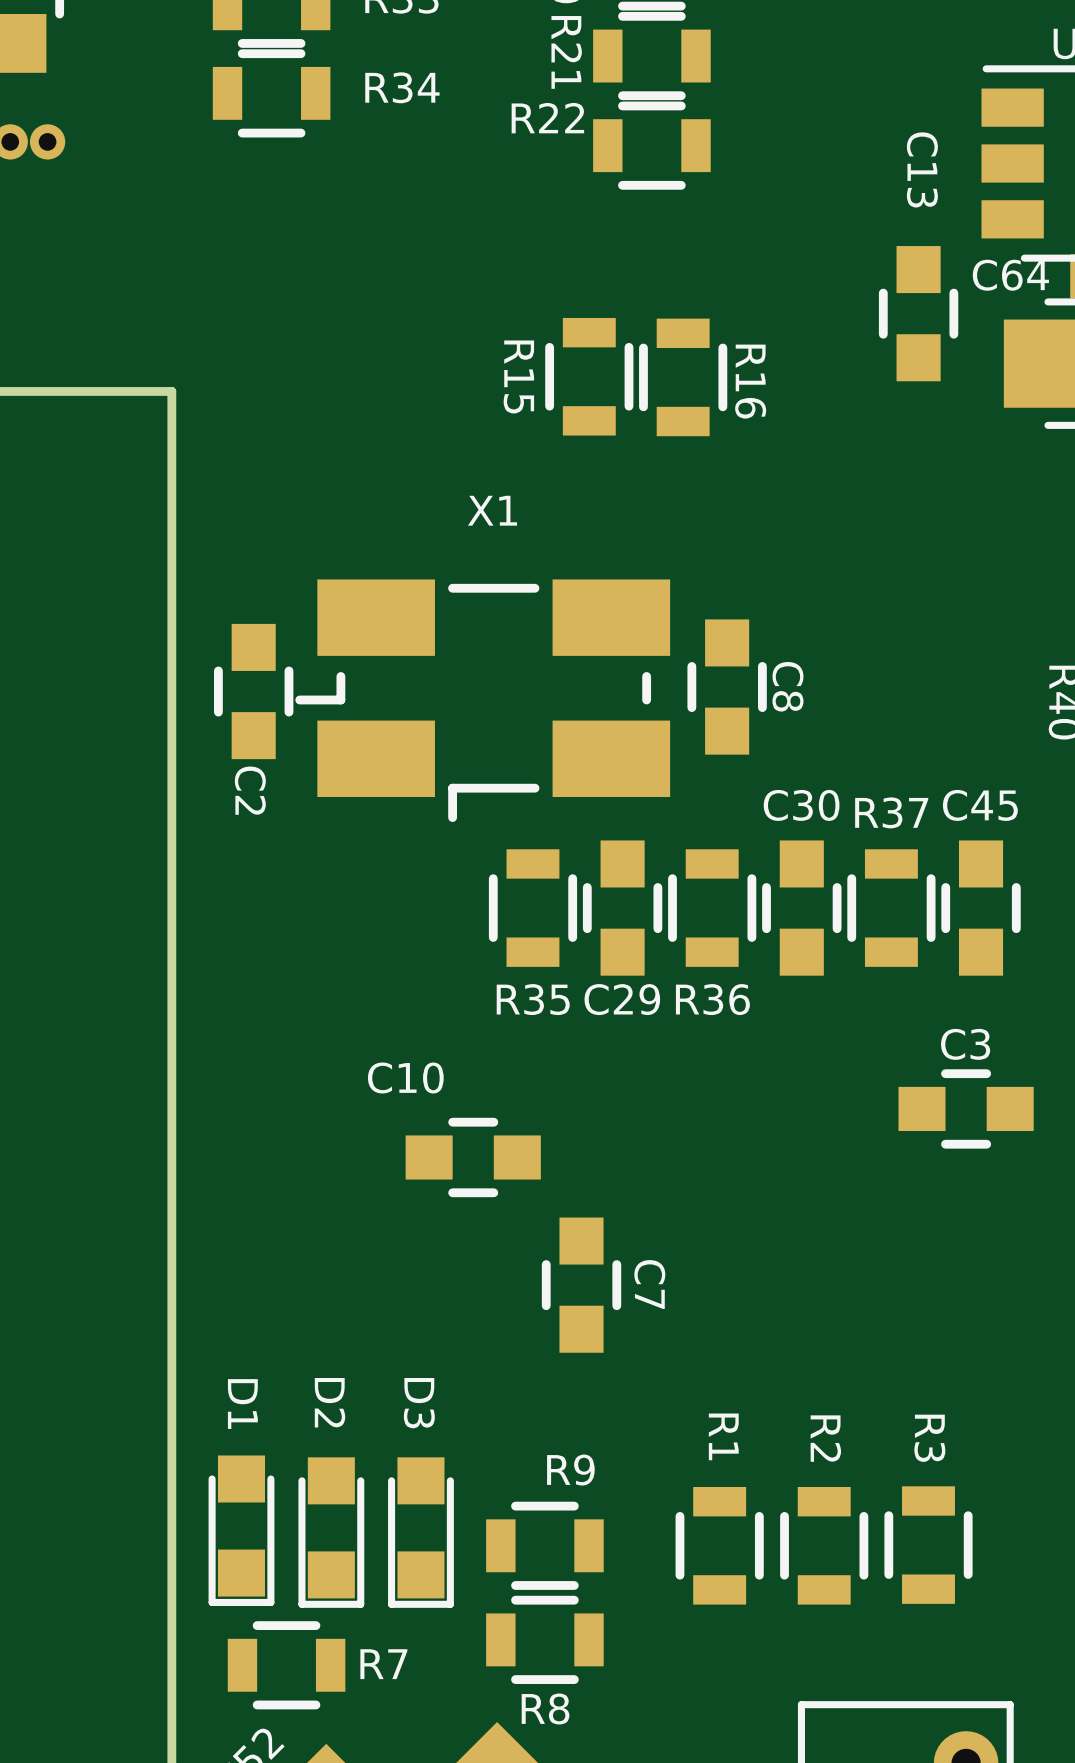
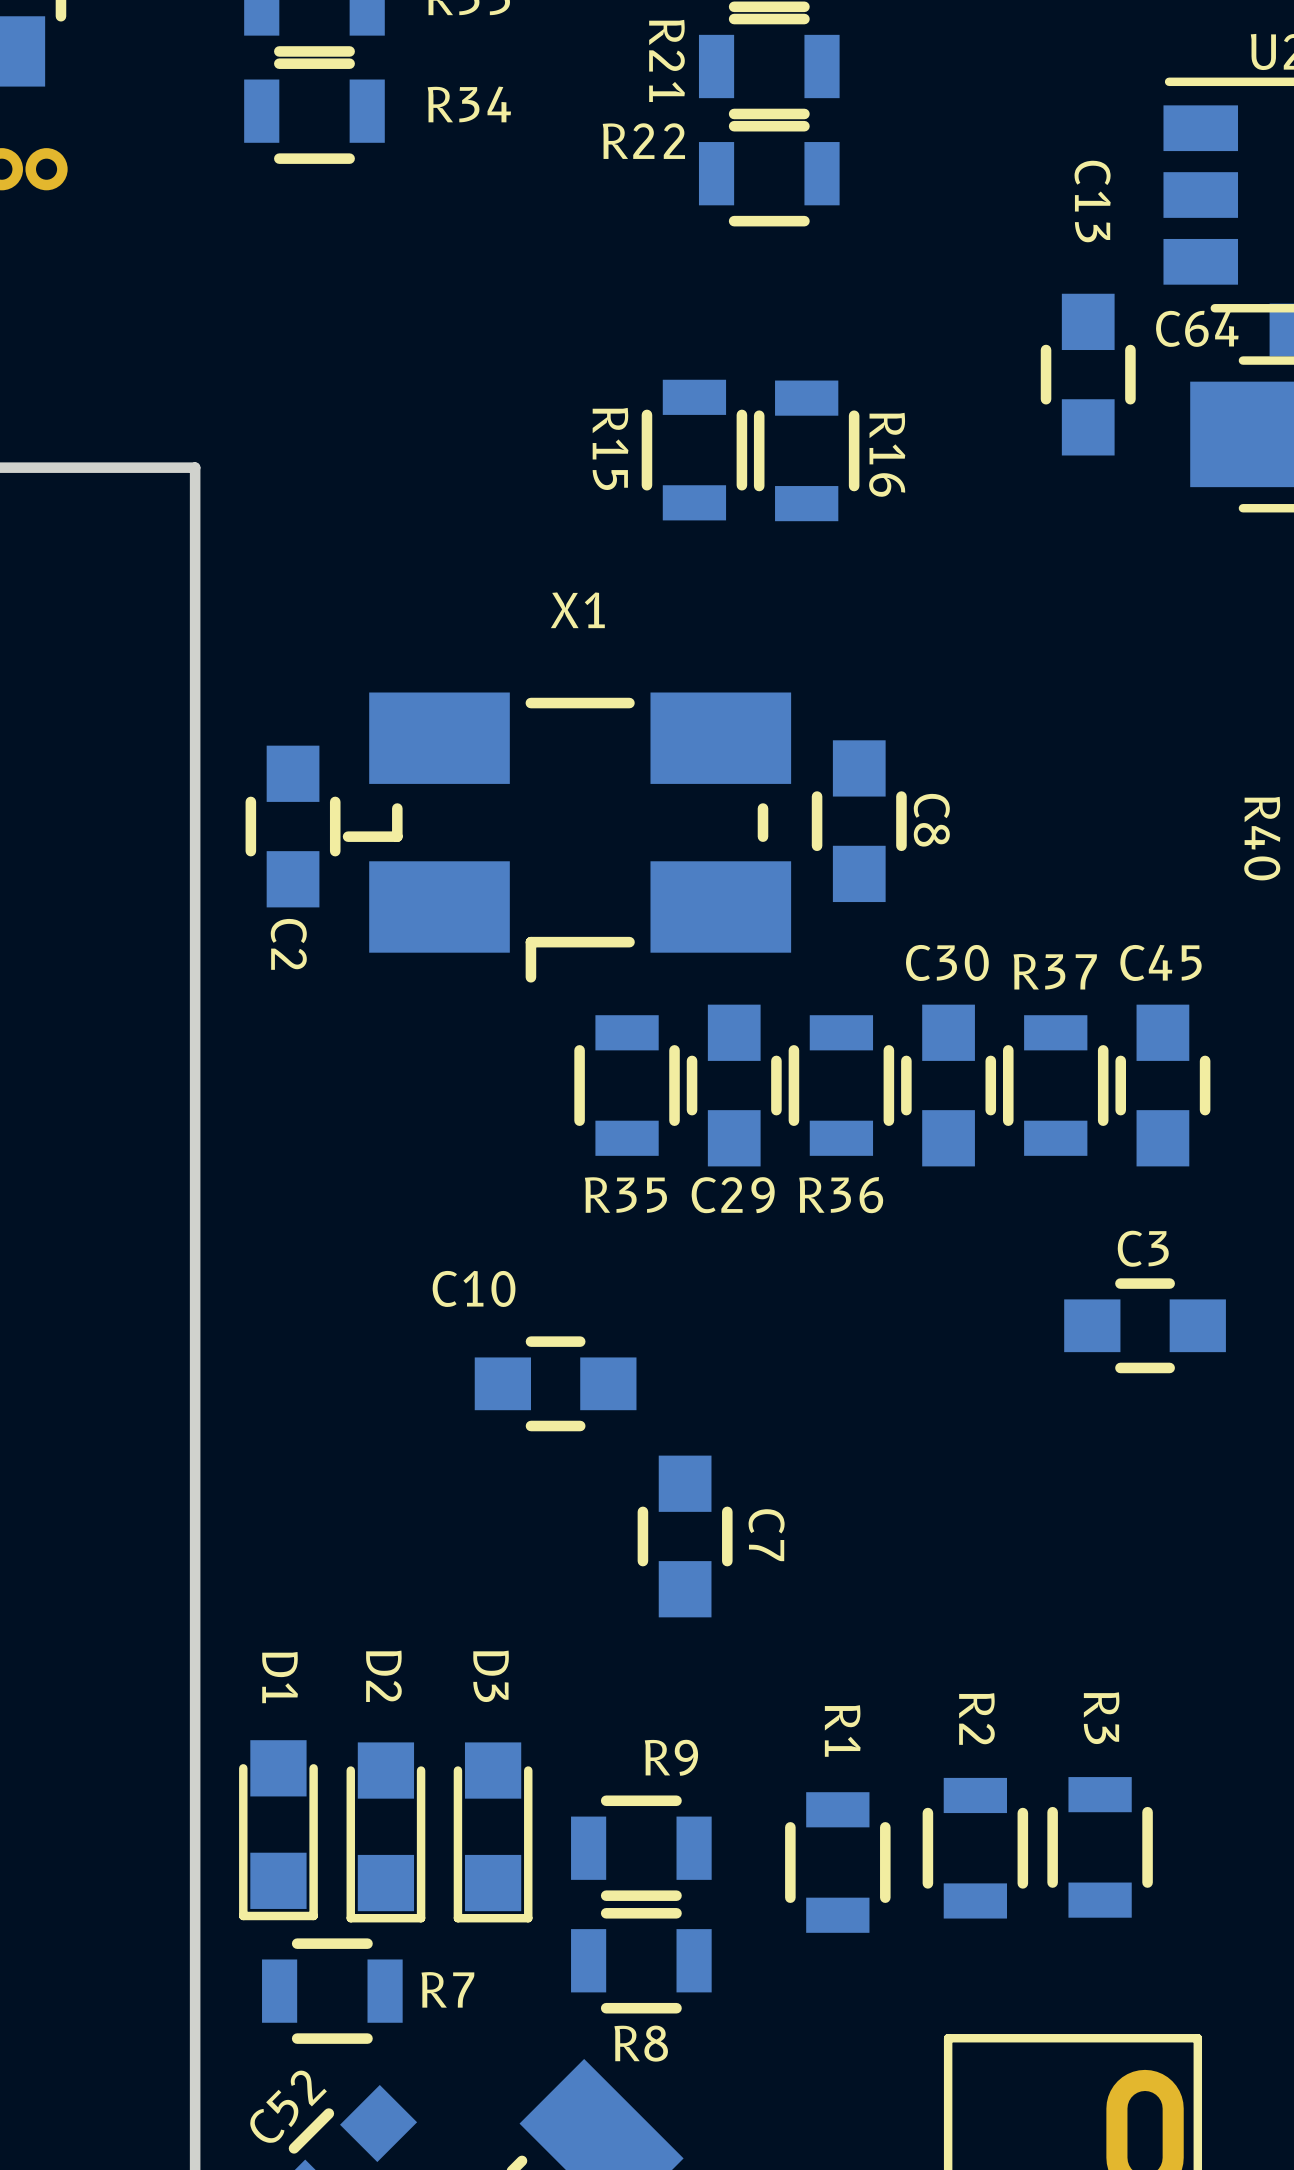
R1 position: (719, 1545) -> (837, 1862)

